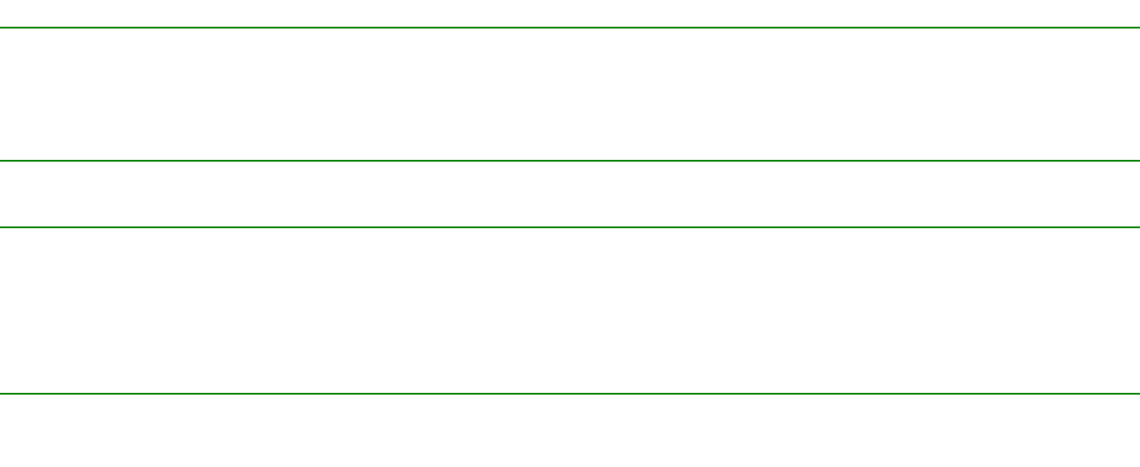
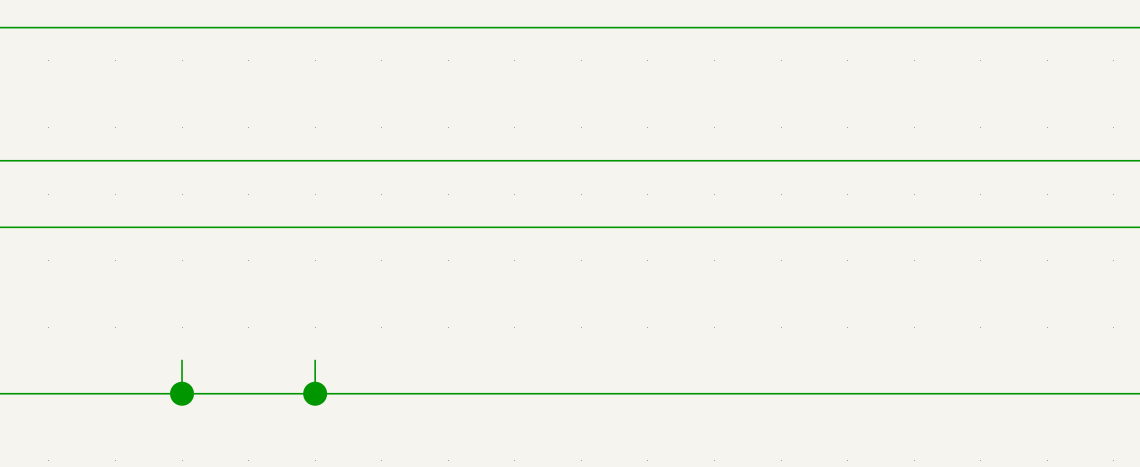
wire: none -> (182, 360) (182, 393)
wire: none -> (315, 360) (315, 393)
junction: none -> (182, 393)
junction: none -> (315, 393)

